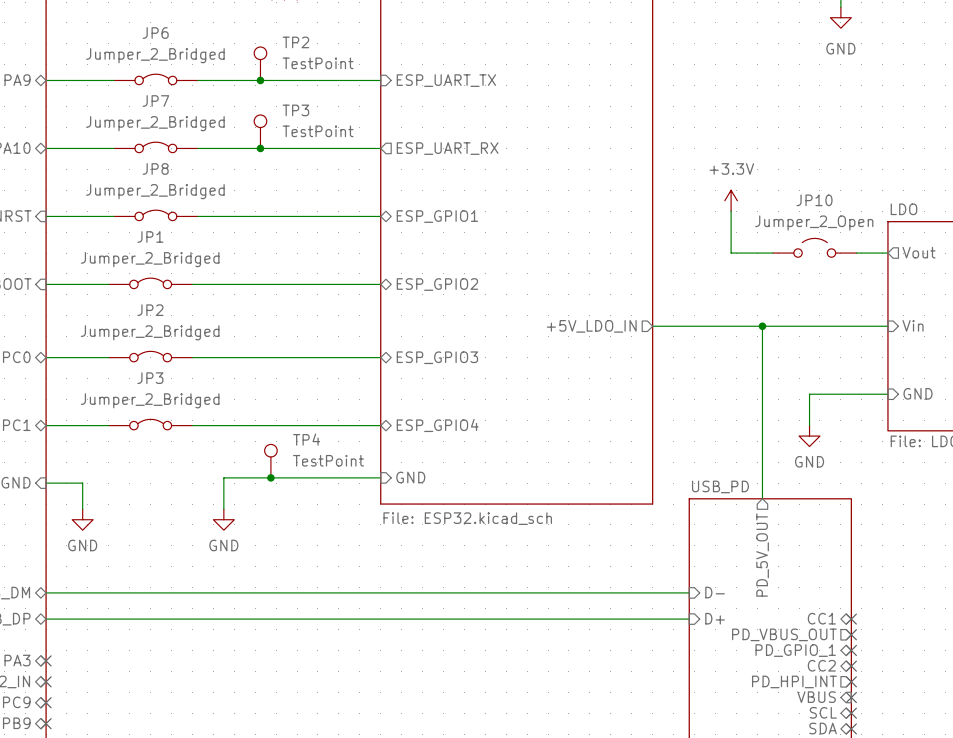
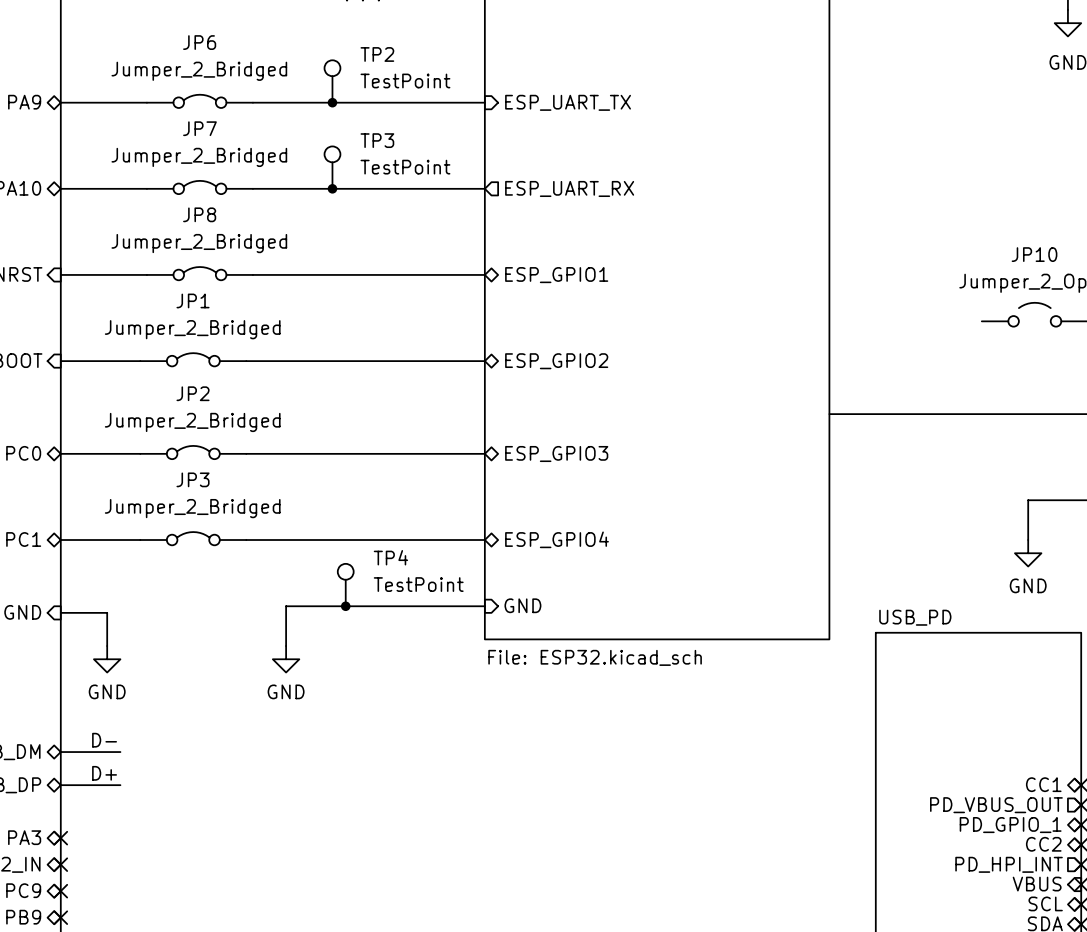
power symbol: +3.3V (731, 200) -> none
wire: (731, 211) (731, 253) (772, 253) -> none
sheet pin: +5V_LDO_IN (591, 326) -> none
wire: (762, 326) (762, 498) -> none
junction: (762, 326) -> none
sheet pin: PD_5V_OUT (762, 555) -> none
label: none -> D- (104, 740)
wire: (93, 592) (689, 592) -> none
sheet pin: D- (715, 592) -> none
label: none -> D+ (104, 773)
sheet pin: D+ (715, 618) -> none
wire: (93, 619) (689, 619) -> none

